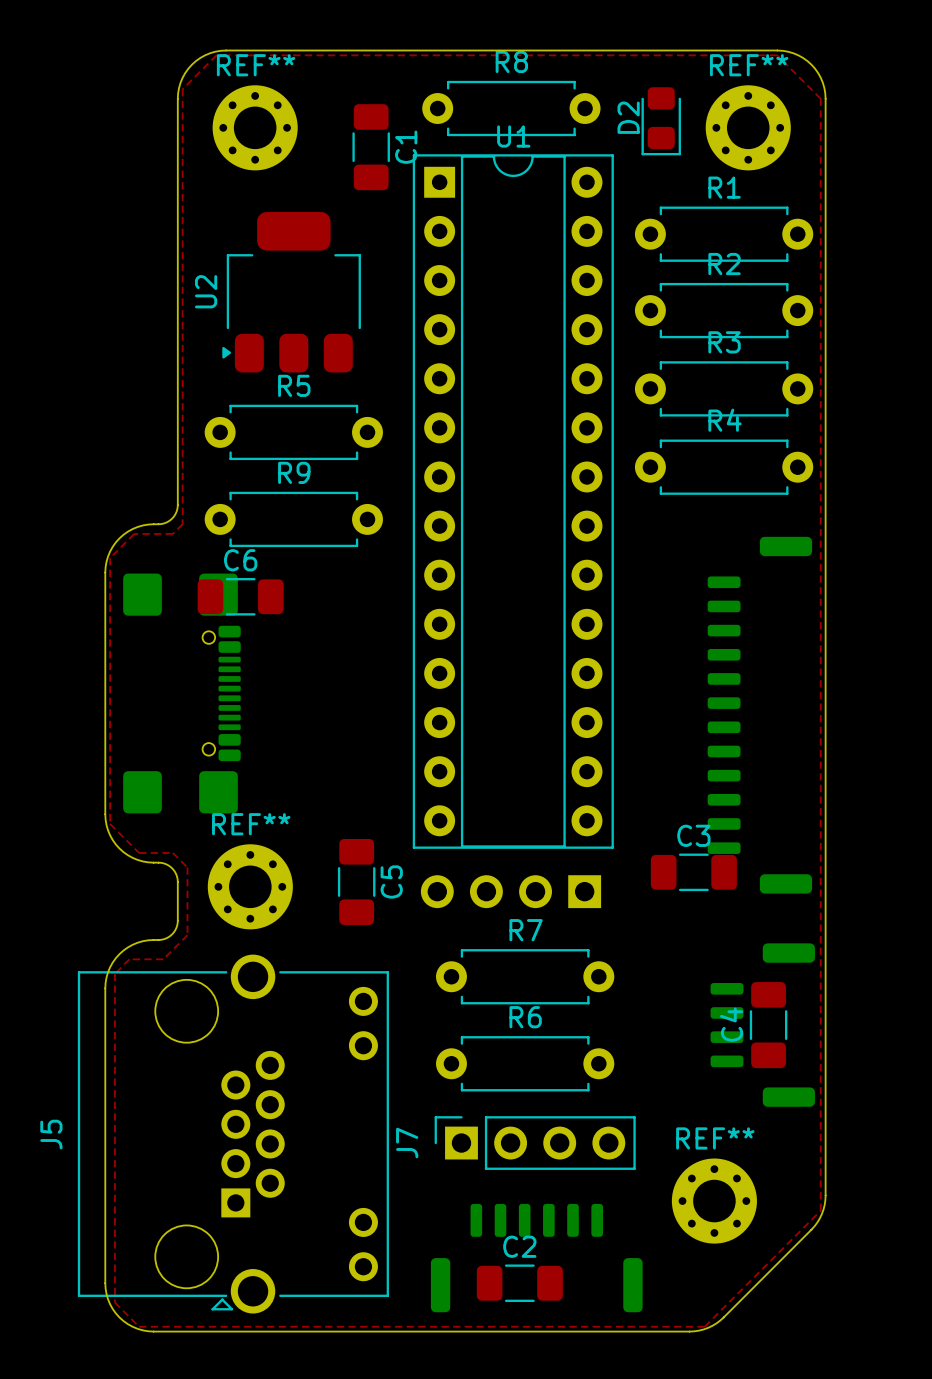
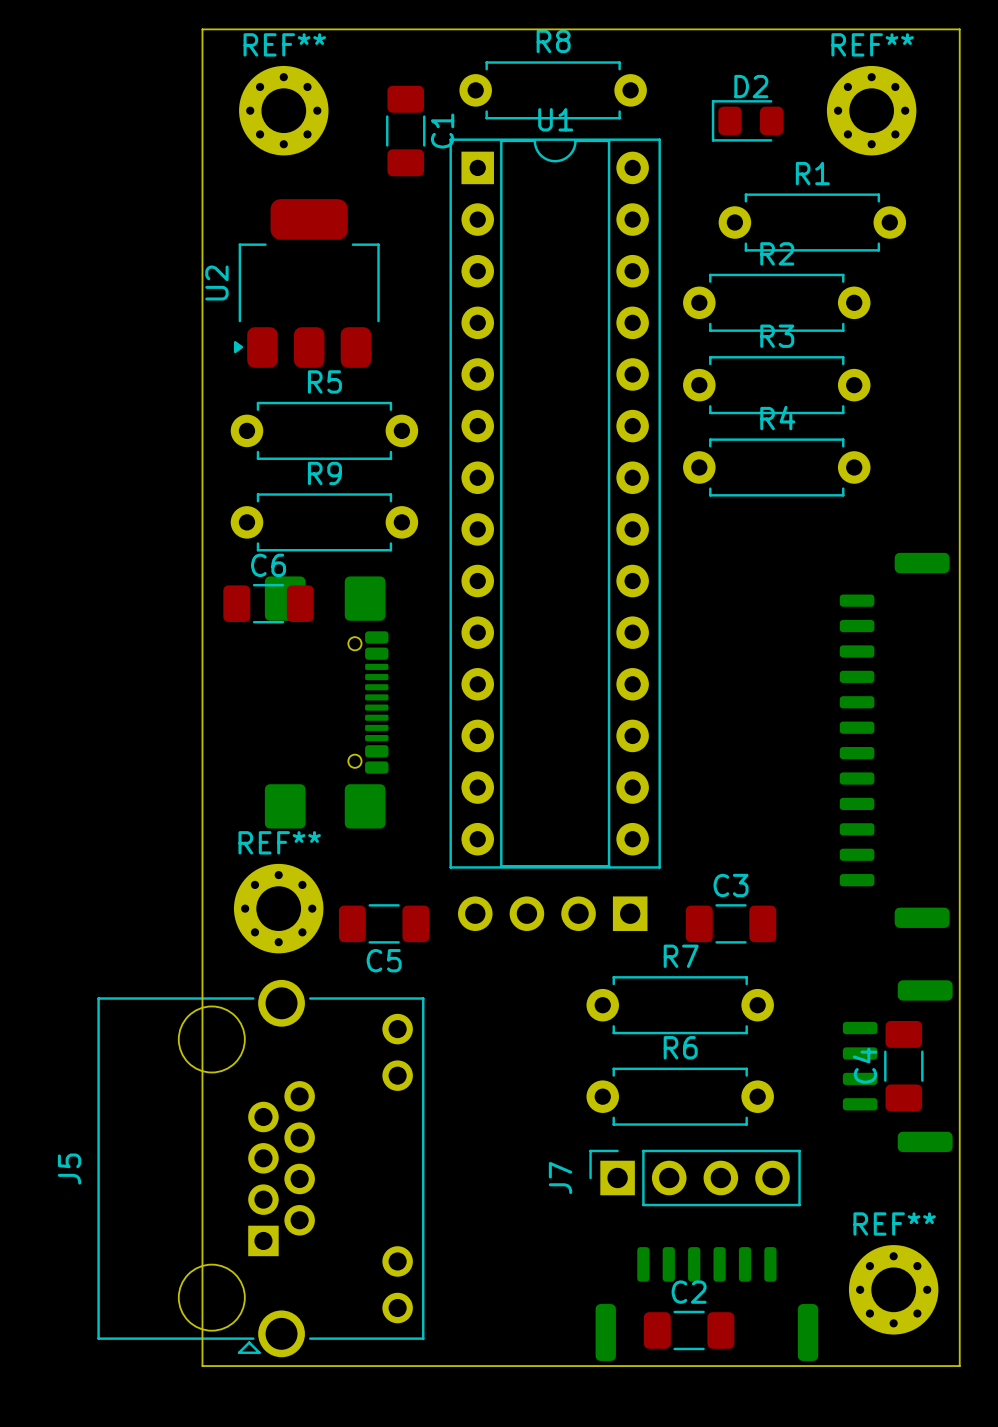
board edge: (226, 50) (210, 53) (191, 64) (182, 77) (177, 98) -> (253, 29) (202, 29) (202, 80)
board edge: (777, 50) (793, 53) (811, 64) (820, 77) (825, 98) (825, 1195) (823, 1209) (817, 1222) (723, 1317) (712, 1325) (698, 1330) (153, 1331) (132, 1326) (119, 1317) (112, 1308) (105, 1288) (105, 982) (112, 962) (123, 950) (142, 941) (166, 938) (174, 930) (177, 920) -> (832, 29) (959, 29) (959, 1366) (202, 1366) (202, 944)
top zone outline: (216, 55) (777, 55) (820, 98) (820, 1210) (704, 1326) (139, 1326) (114, 1302) (114, 973) (129, 959) (163, 959) (187, 935) (187, 867) (172, 852) (139, 852) (110, 823) (110, 558) (134, 533) (172, 533) (182, 524) (182, 89) (216, 55) -> none
D2 rotation: 0° (661, 121) -> 90° clockwise (747, 120)
REF** position: (748, 127) -> (871, 110)
R1 position: (724, 234) -> (812, 222)
U2 position: (291, 292) -> (306, 283)
board edge: (177, 504) (175, 513) (168, 521) (137, 526) (119, 538) (108, 556) (105, 572) (106, 825) (112, 840) (123, 852) (142, 861) (166, 864) (174, 871) (177, 881) -> (202, 507) (202, 903)
part position: (181, 693) -> (326, 702)
part position: (759, 715) -> (894, 740)
C3 position: (693, 872) -> (731, 923)
C5 rotation: 0° (356, 881) -> 90° clockwise (384, 923)
R7 position: (525, 976) -> (680, 1005)
part position: (762, 1025) -> (897, 1066)
C4 position: (768, 1025) -> (903, 1066)
R6 position: (525, 1063) -> (680, 1096)
J7 position: (535, 1143) -> (695, 1177)
REF** position: (714, 1201) -> (893, 1289)
part position: (536, 1258) -> (706, 1304)
C2 position: (519, 1283) -> (689, 1330)

